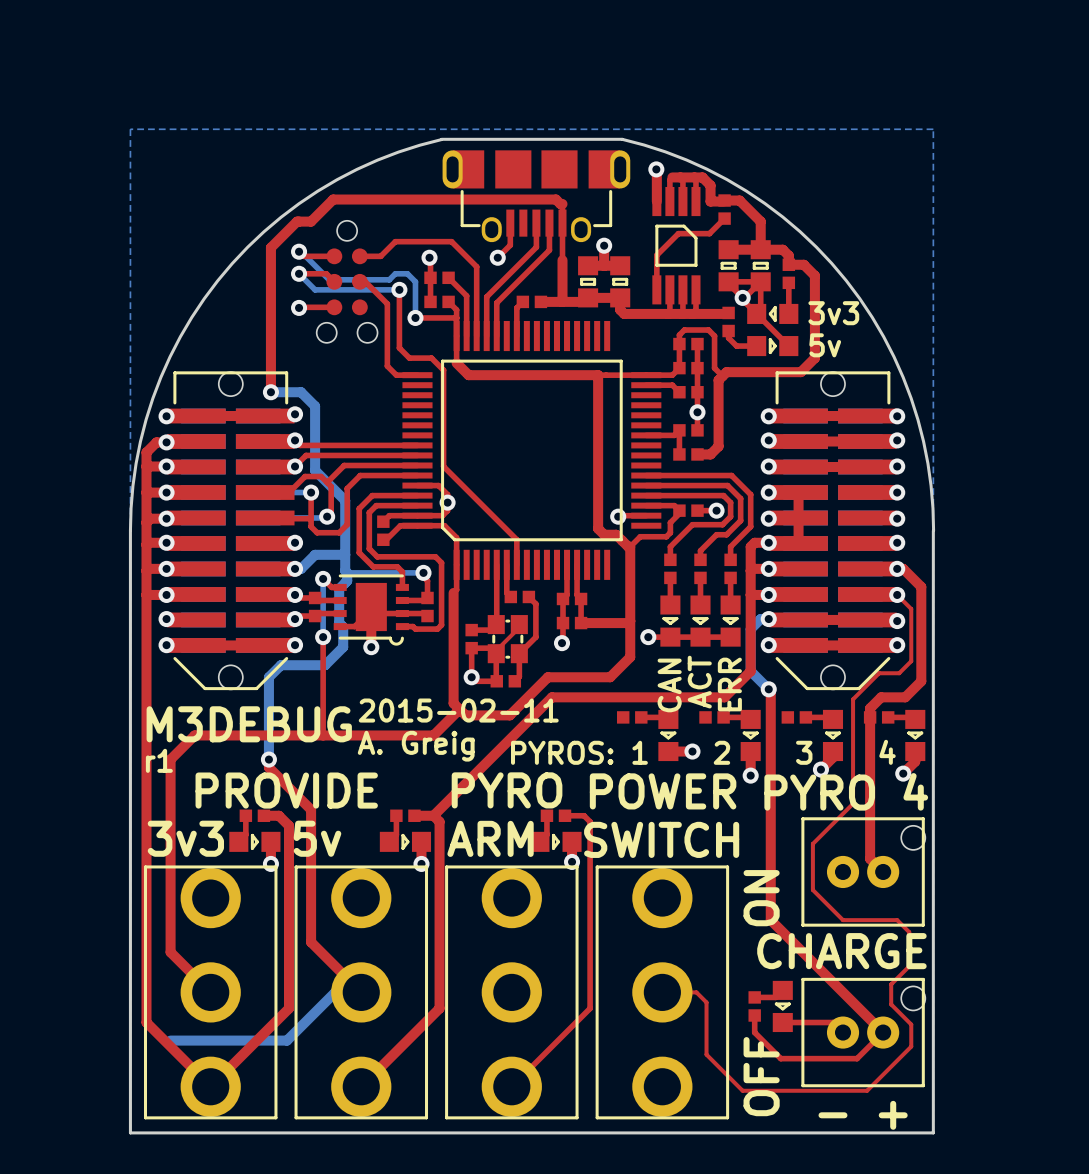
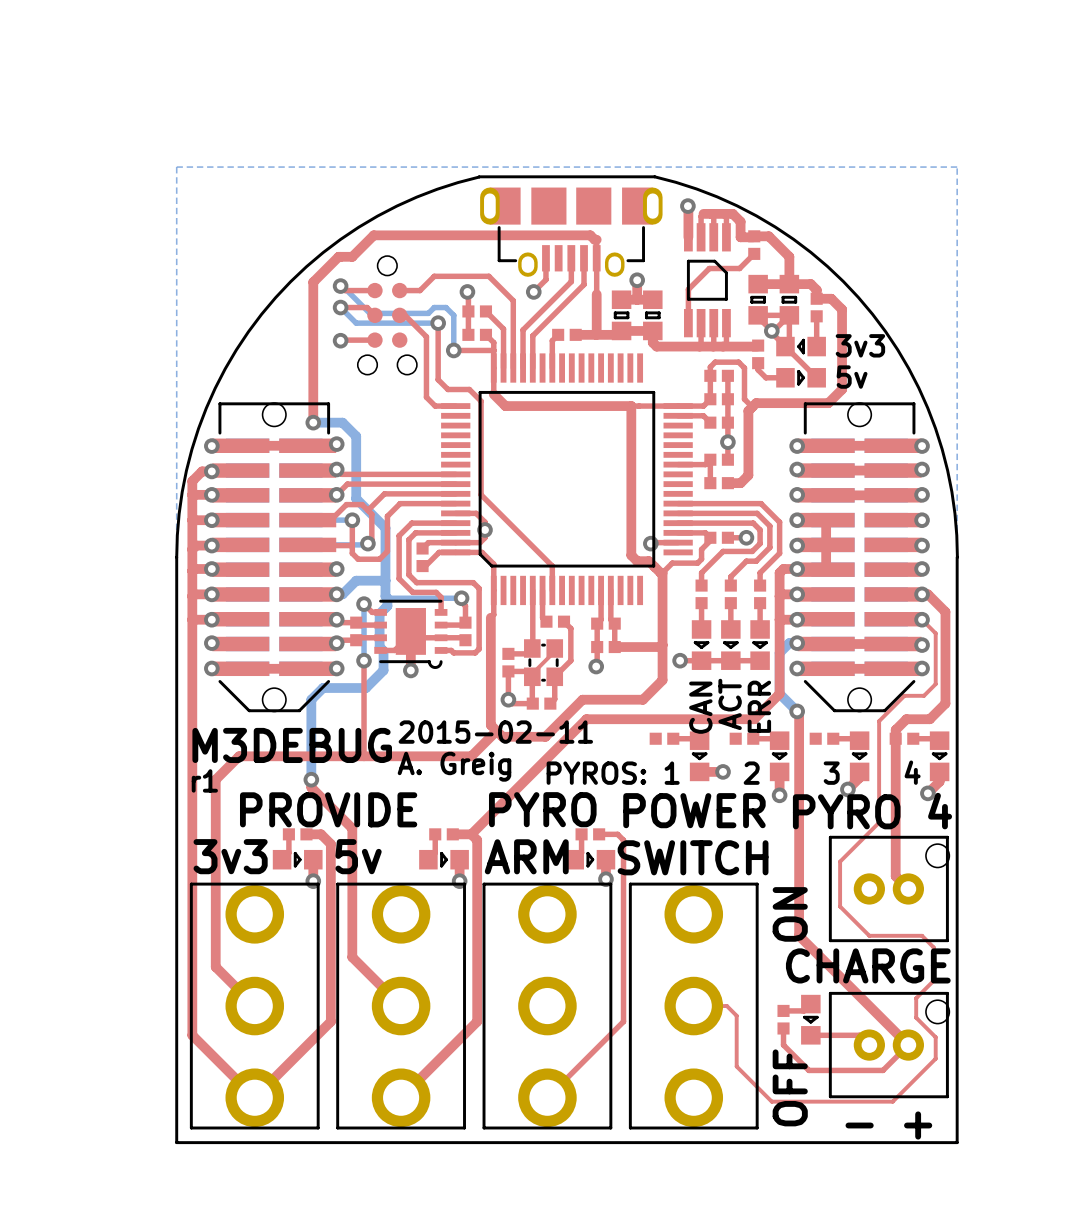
bottom track: (361, 992) (335, 992) (287, 1040) (170, 1040) -> none

